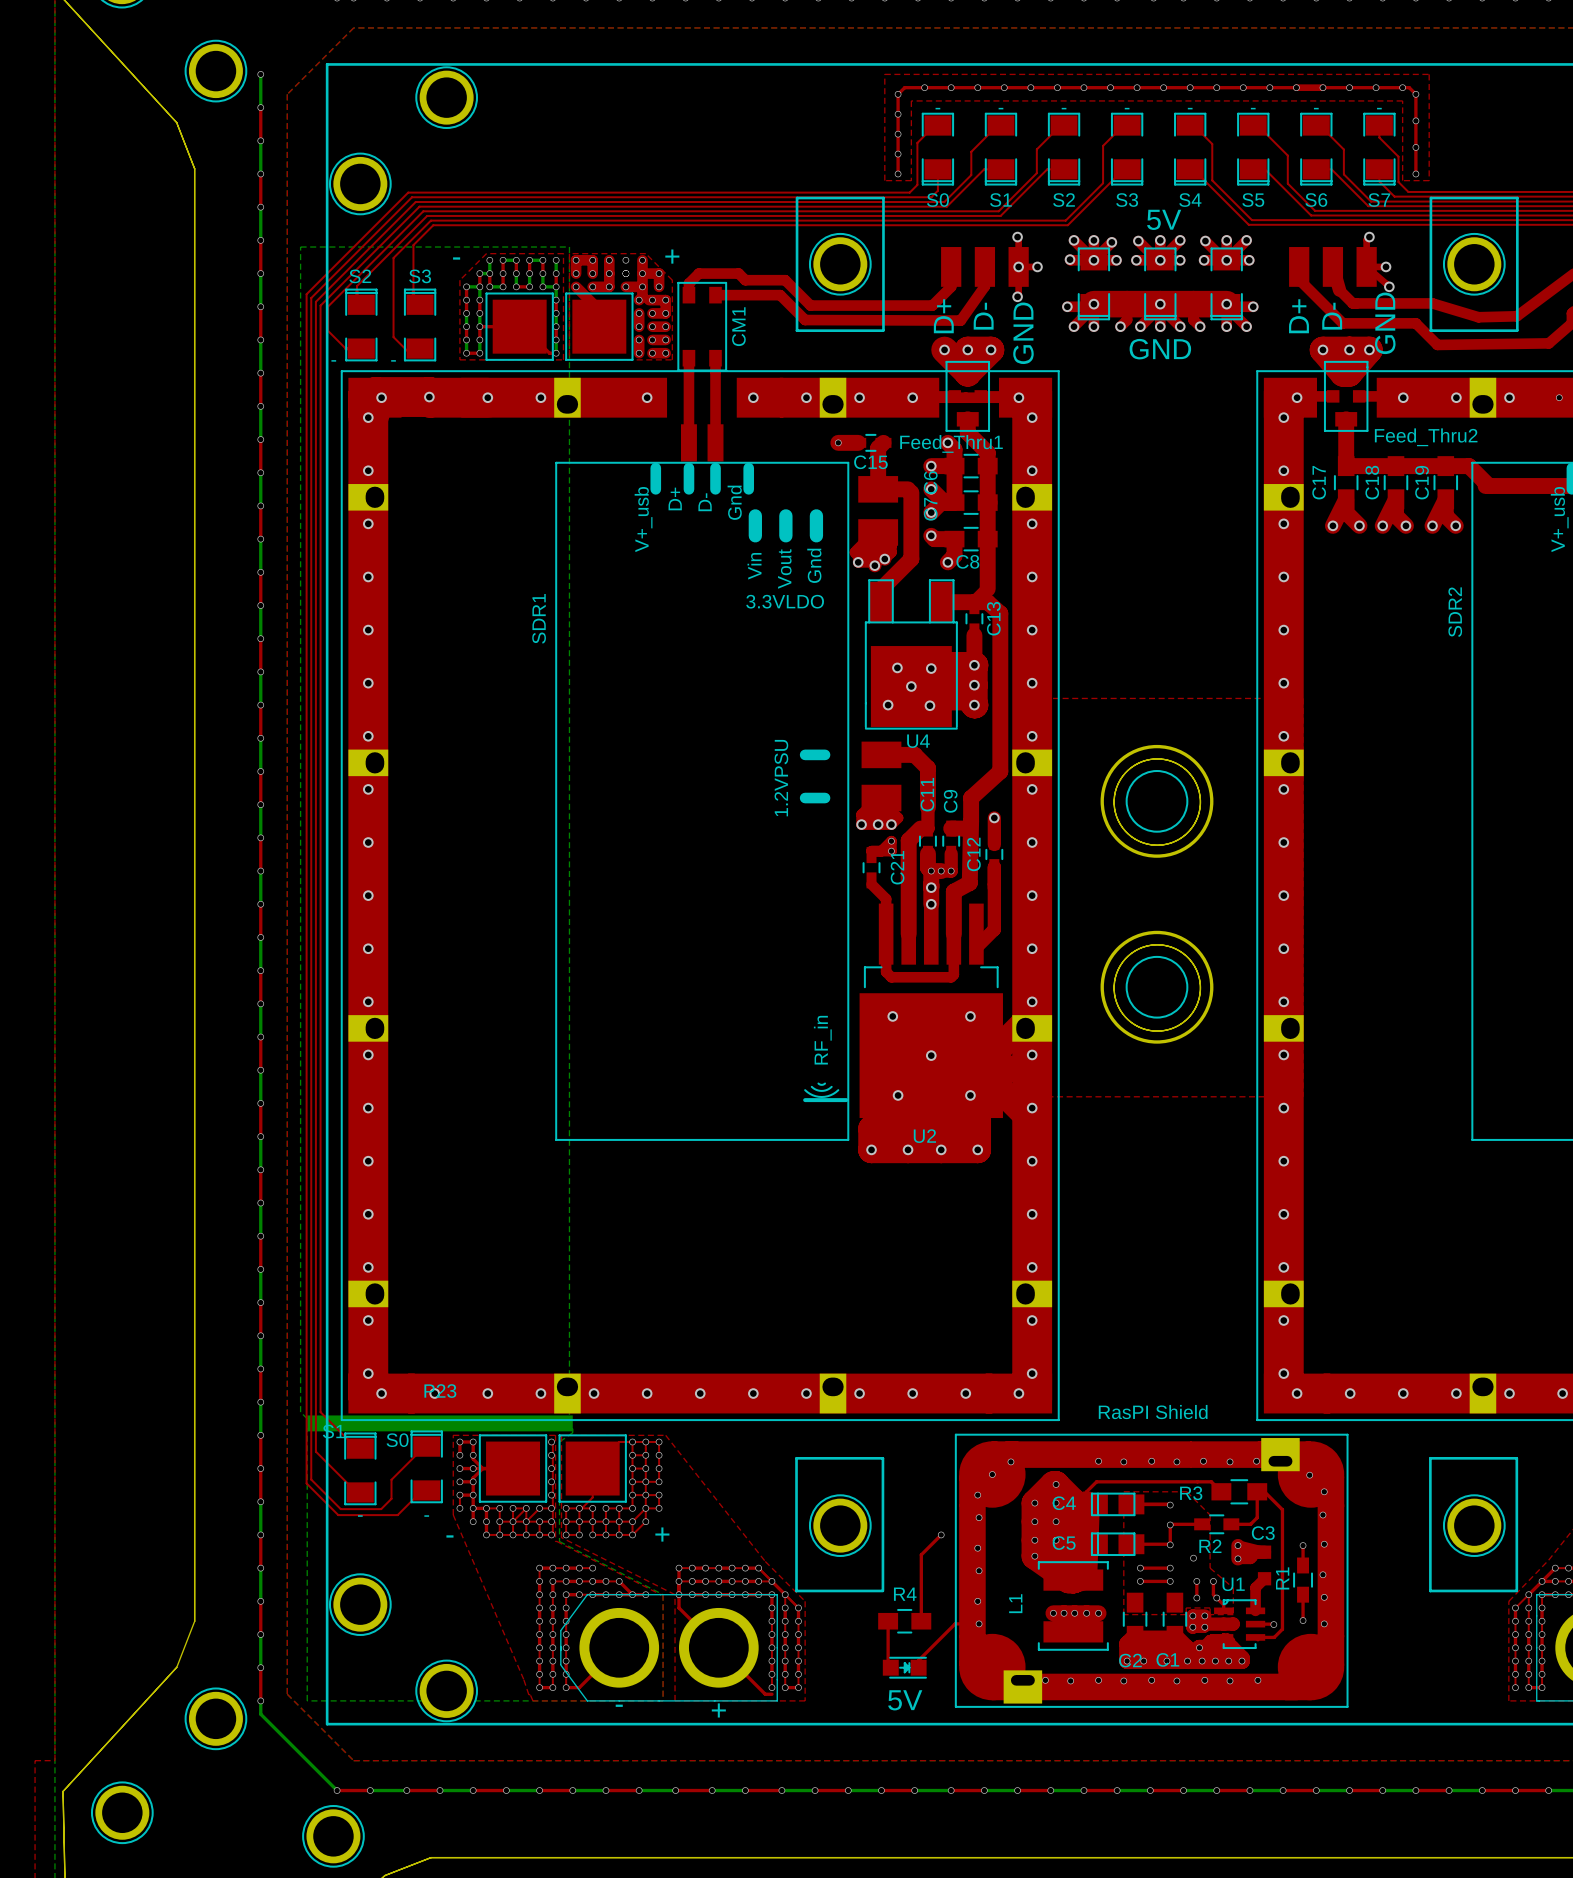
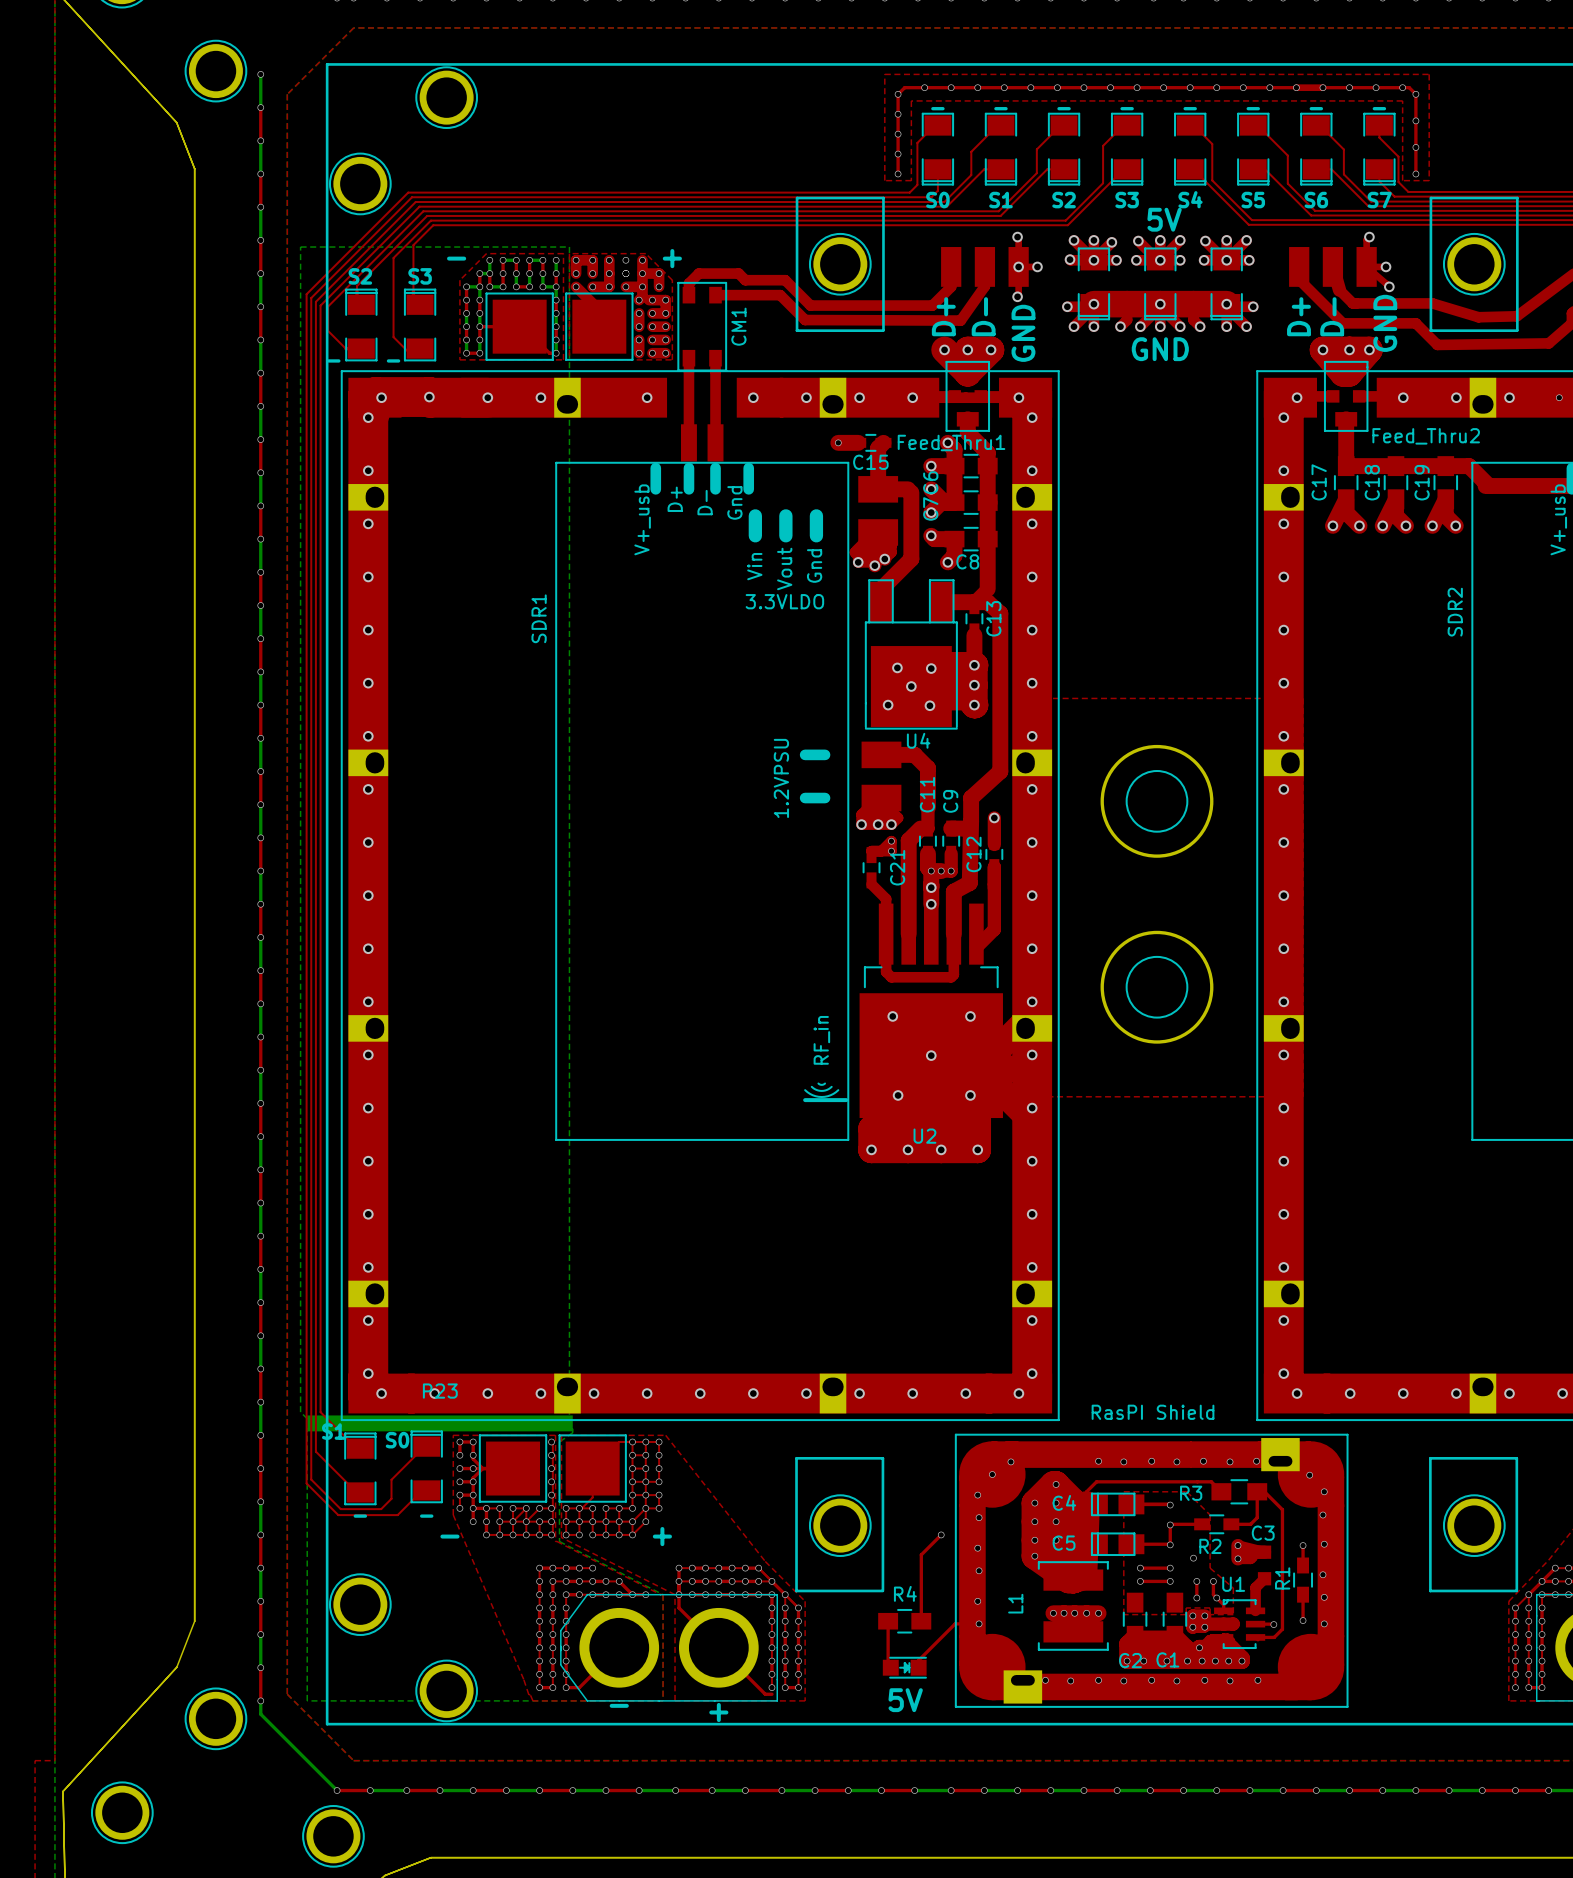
round board edge: [1113, 758, 1202, 846] -> none
round board edge: [1113, 944, 1202, 1032] -> none

